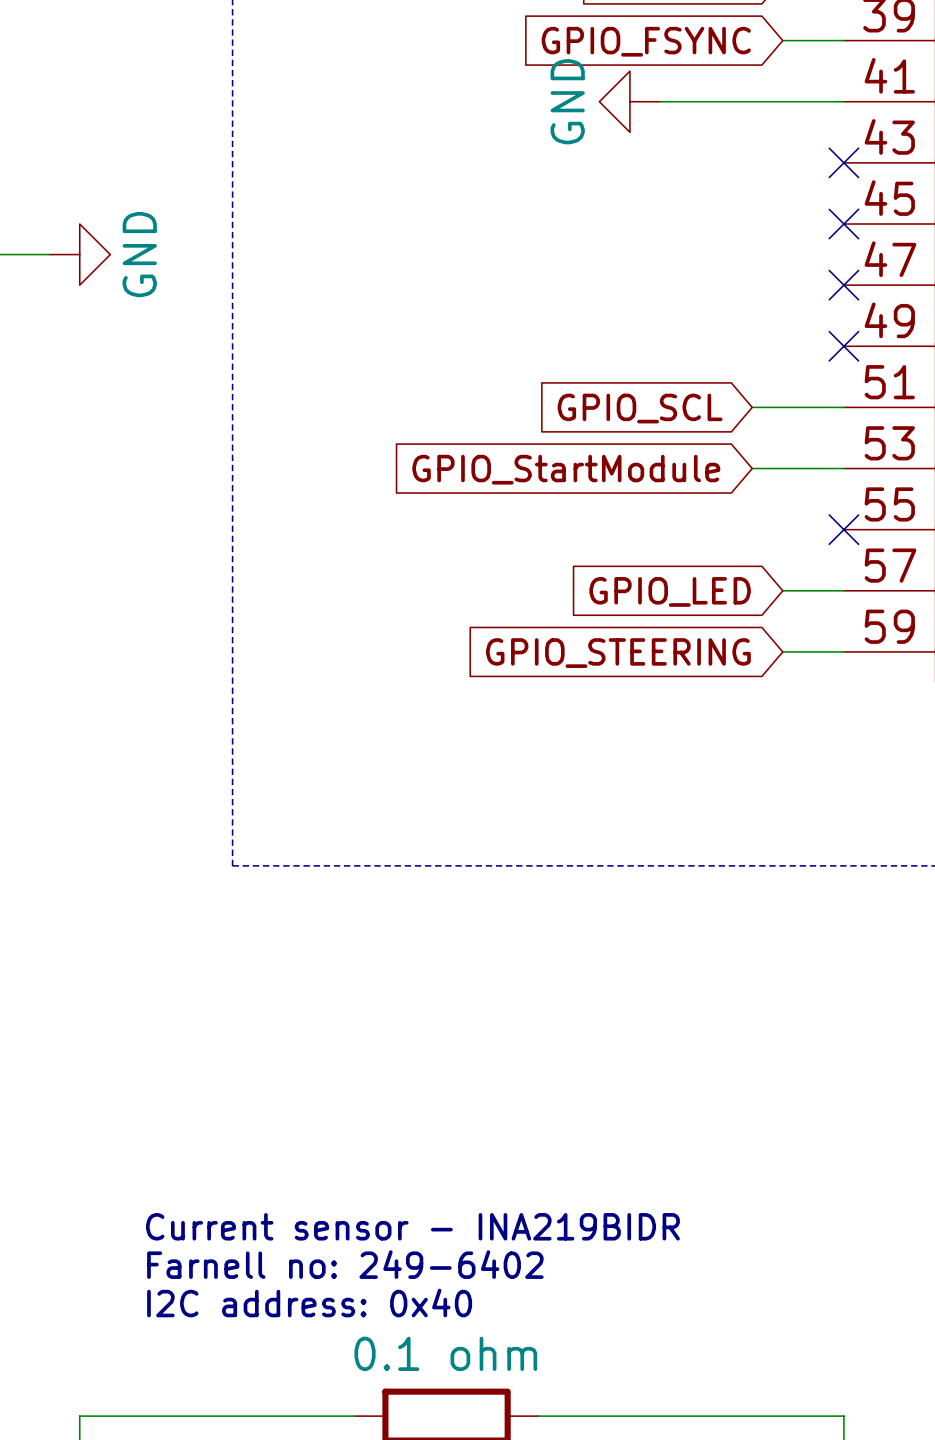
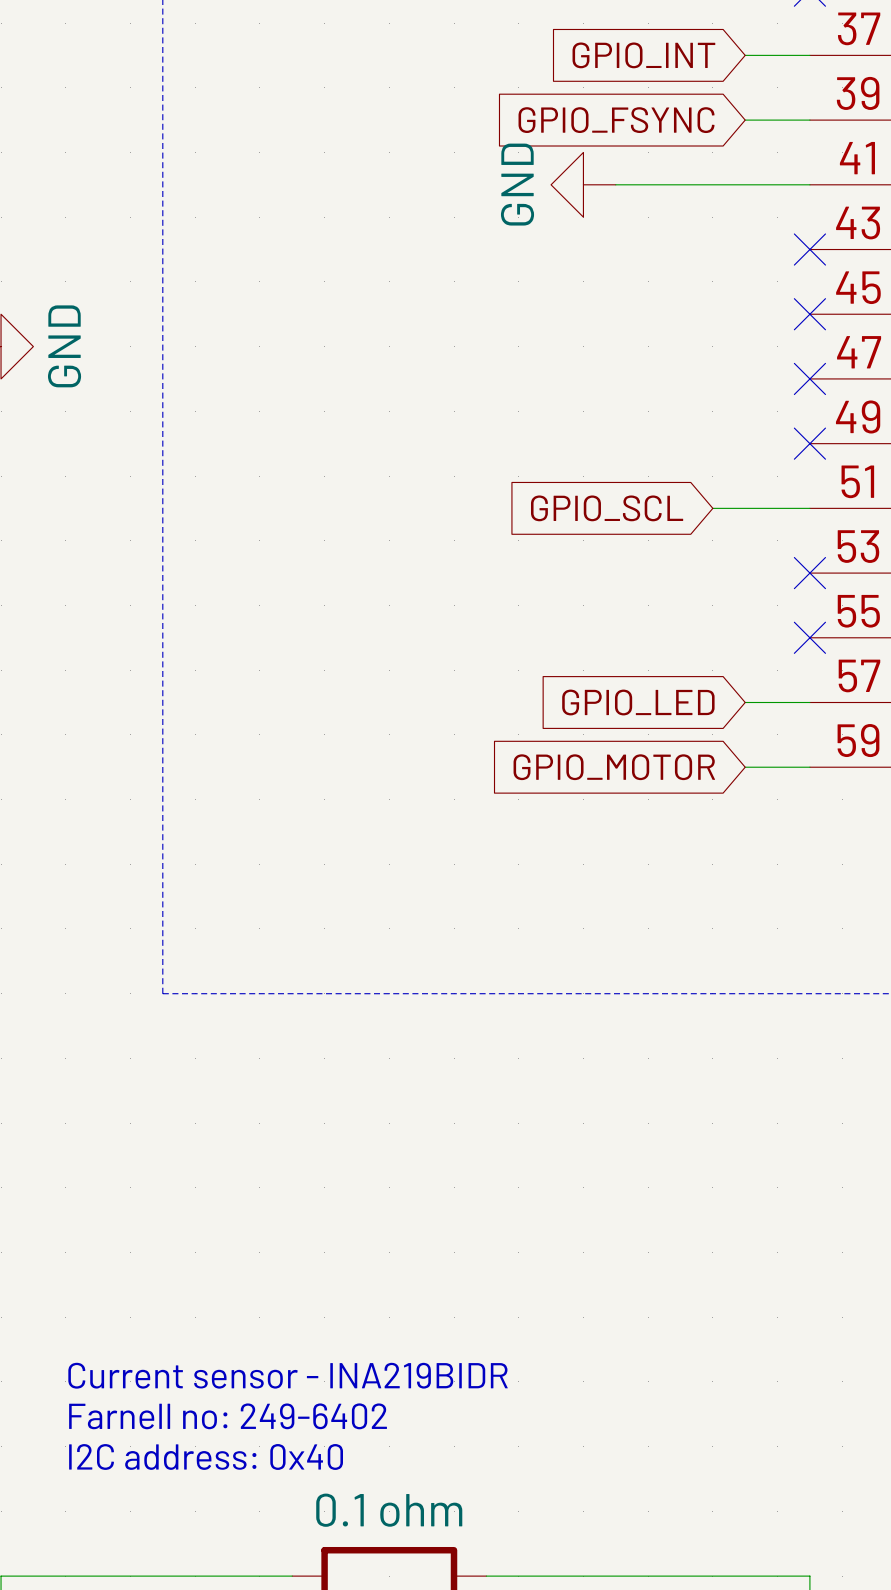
wire: (752, 468) (843, 468) -> none
no-connect mark: none -> (809, 573)
global label: GPIO_StartModule (566, 469) -> none
global label: GPIO_STEERING (618, 653) -> GPIO_MOTOR (614, 767)

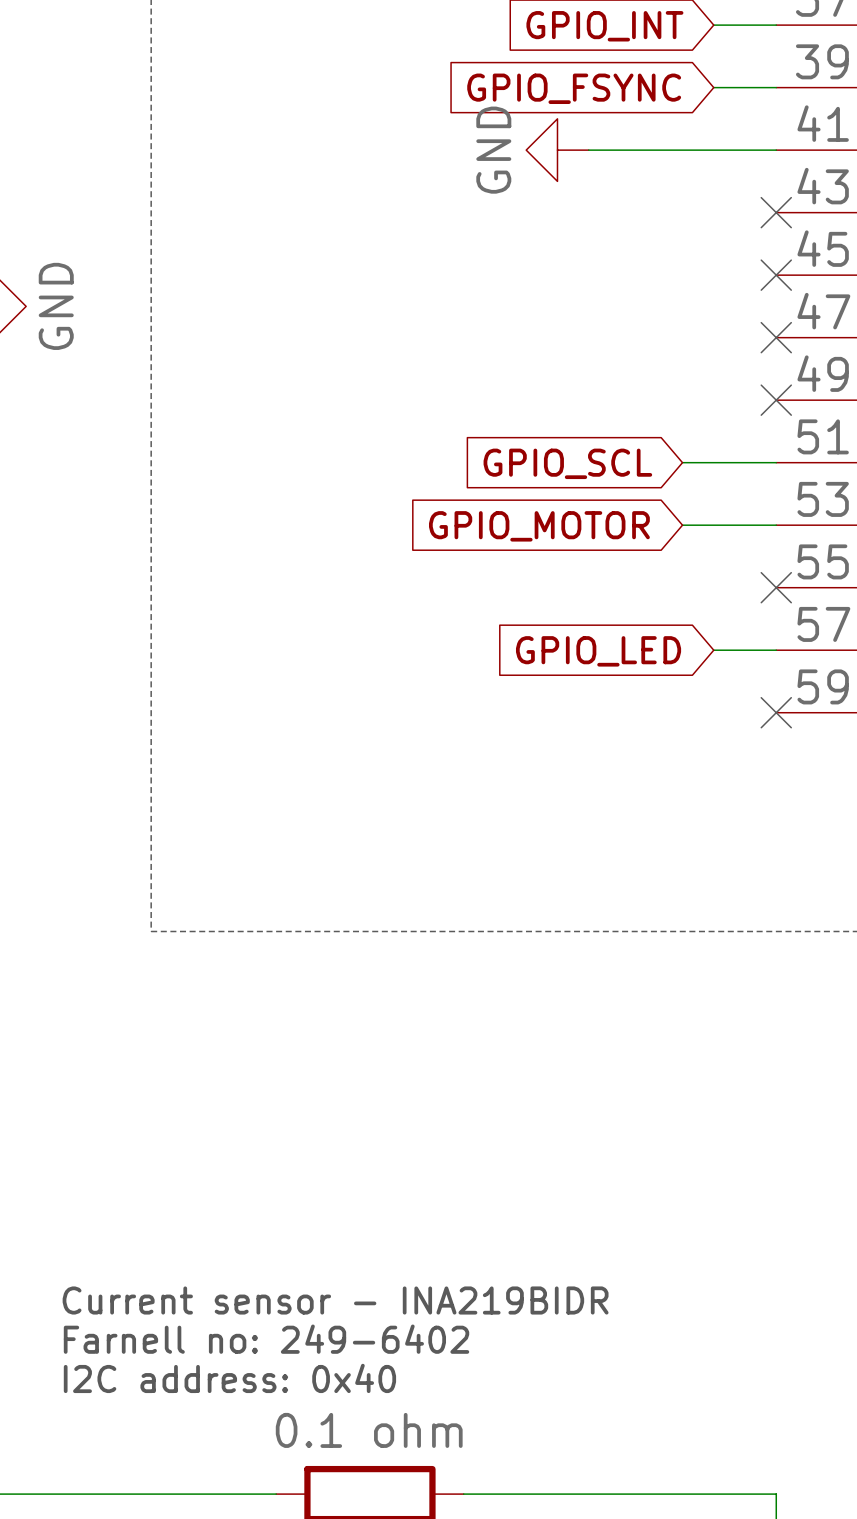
wire: none -> (682, 525) (776, 525)
no-connect mark: (809, 573) -> none
global label position: GPIO_MOTOR (614, 767) -> GPIO_MOTOR (539, 526)
wire: (745, 767) (809, 767) -> none
no-connect mark: none -> (776, 712)

